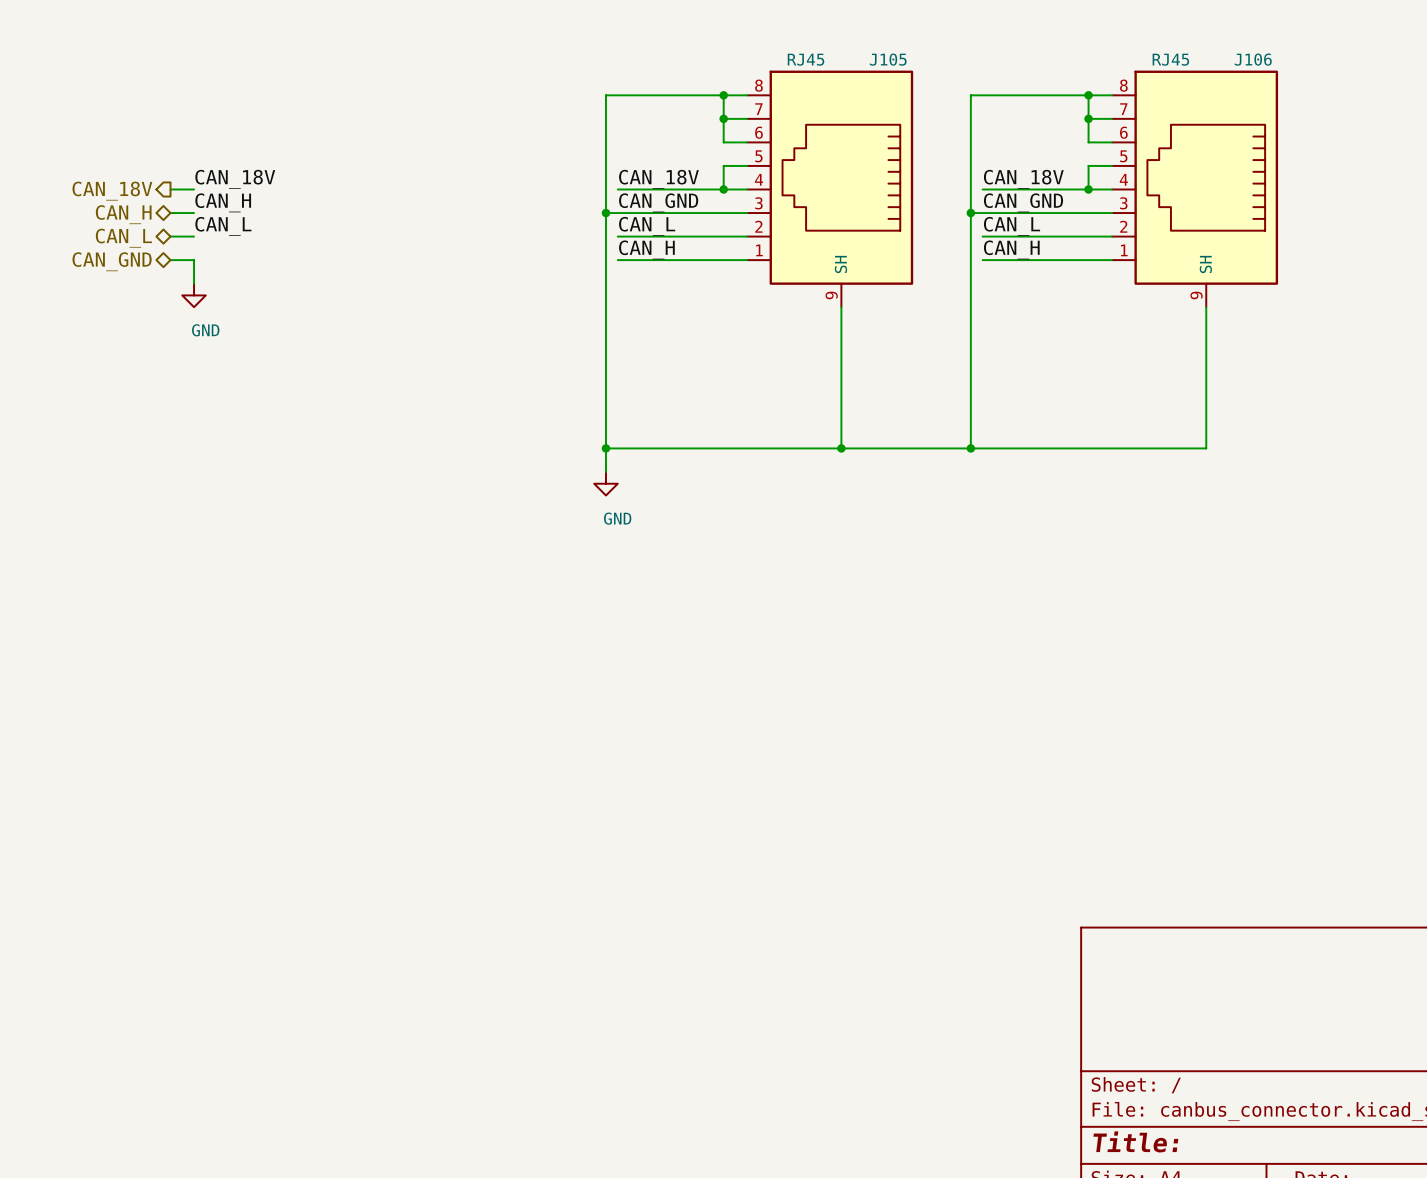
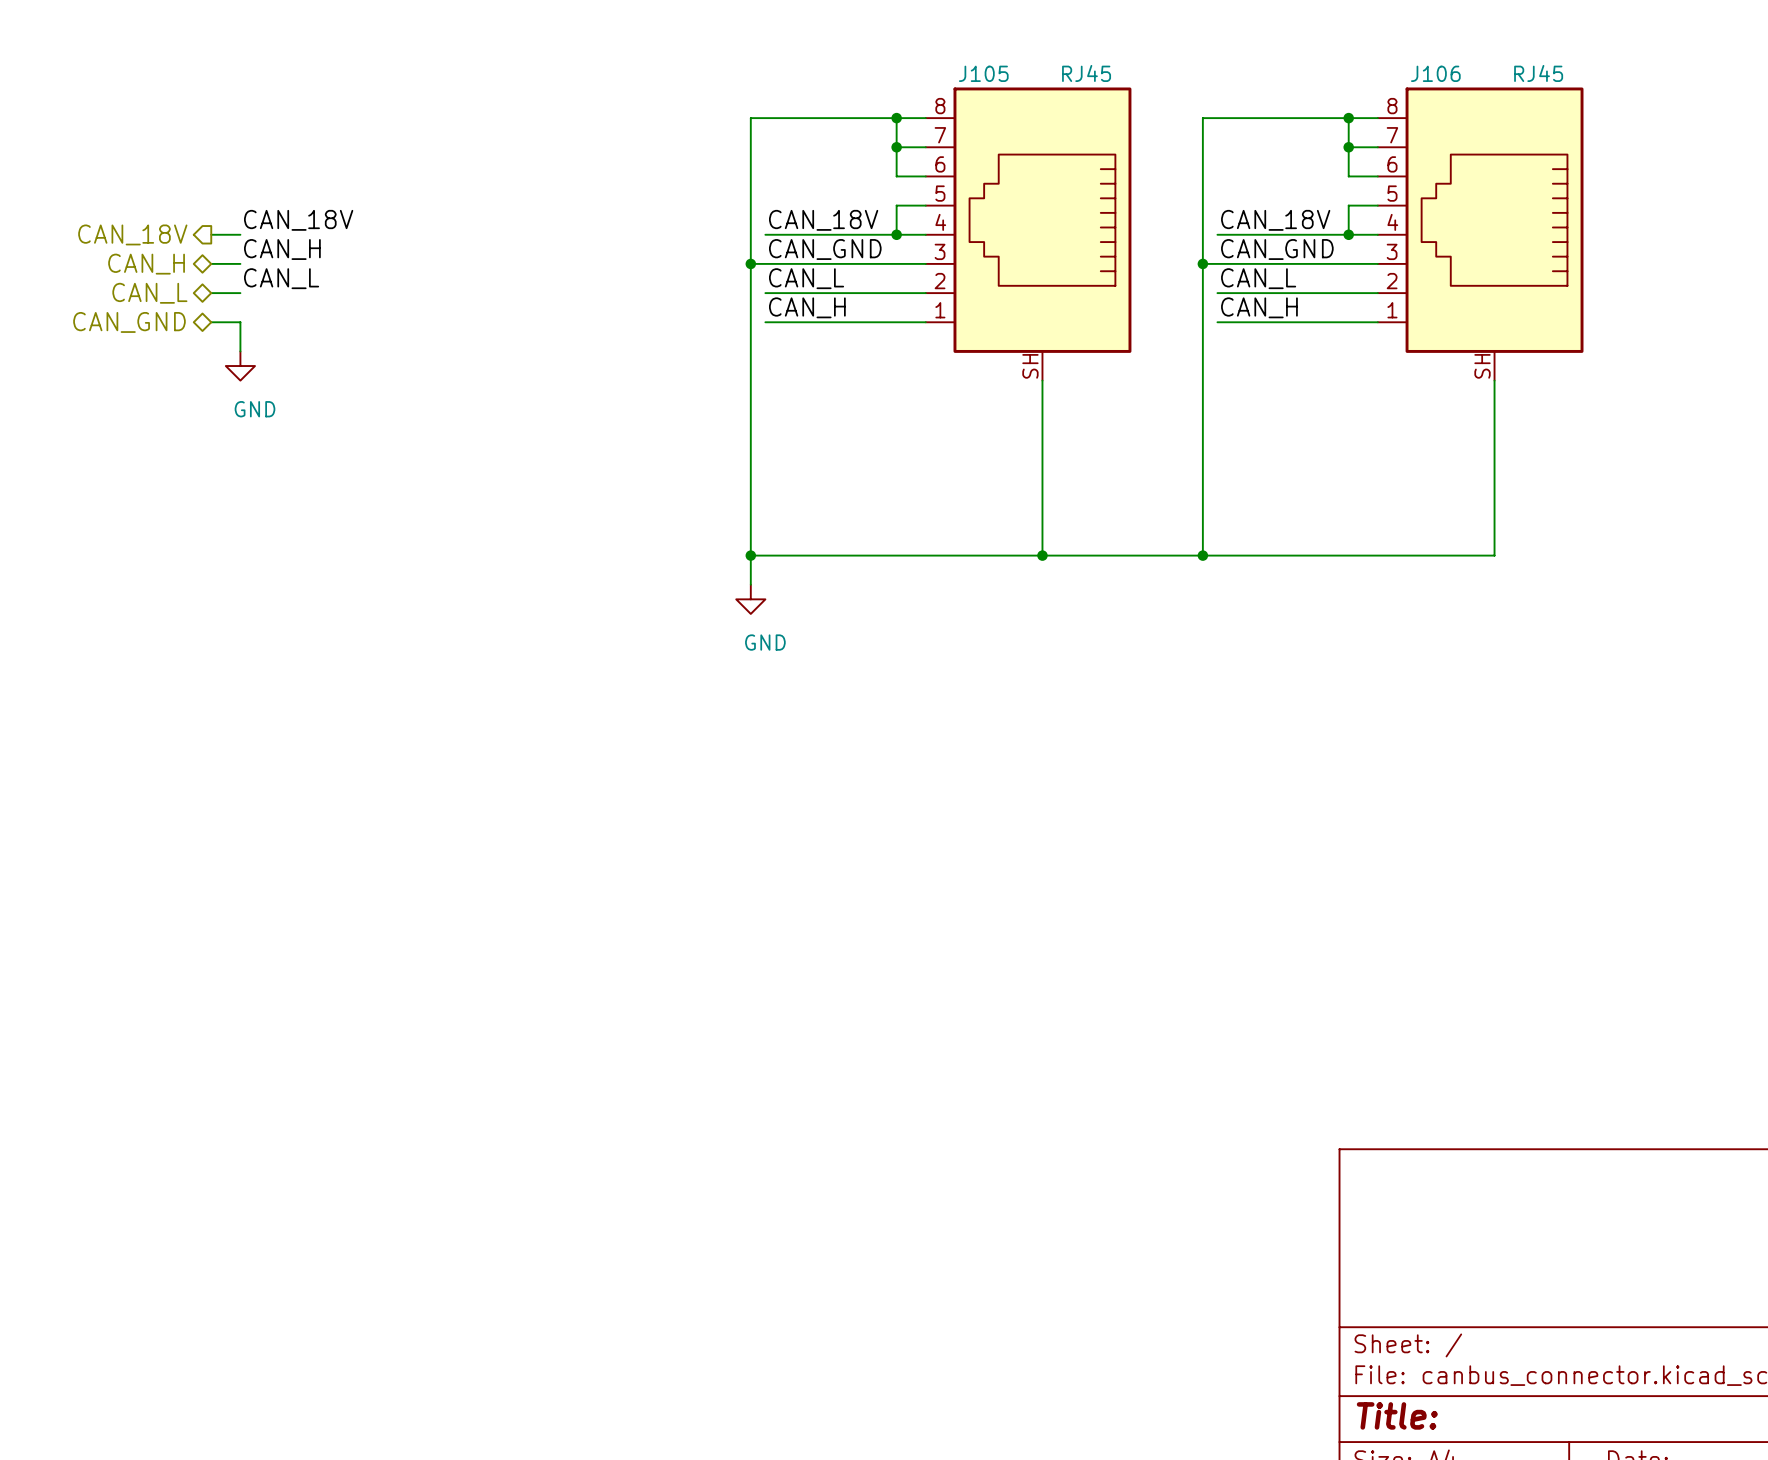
J105 value position: RJ45 (806, 59) -> RJ45 (1086, 73)
J105 name position: J105 (888, 59) -> J105 (983, 73)
J106 value position: RJ45 (1170, 59) -> RJ45 (1538, 73)
J106 name position: J106 (1253, 59) -> J106 (1435, 73)
J105 pin name: SH (840, 264) -> none
J106 pin name: SH (1205, 264) -> none
J105 pin number: 9 (831, 295) -> SH (1030, 366)
J106 pin number: 9 (1196, 295) -> SH (1482, 366)

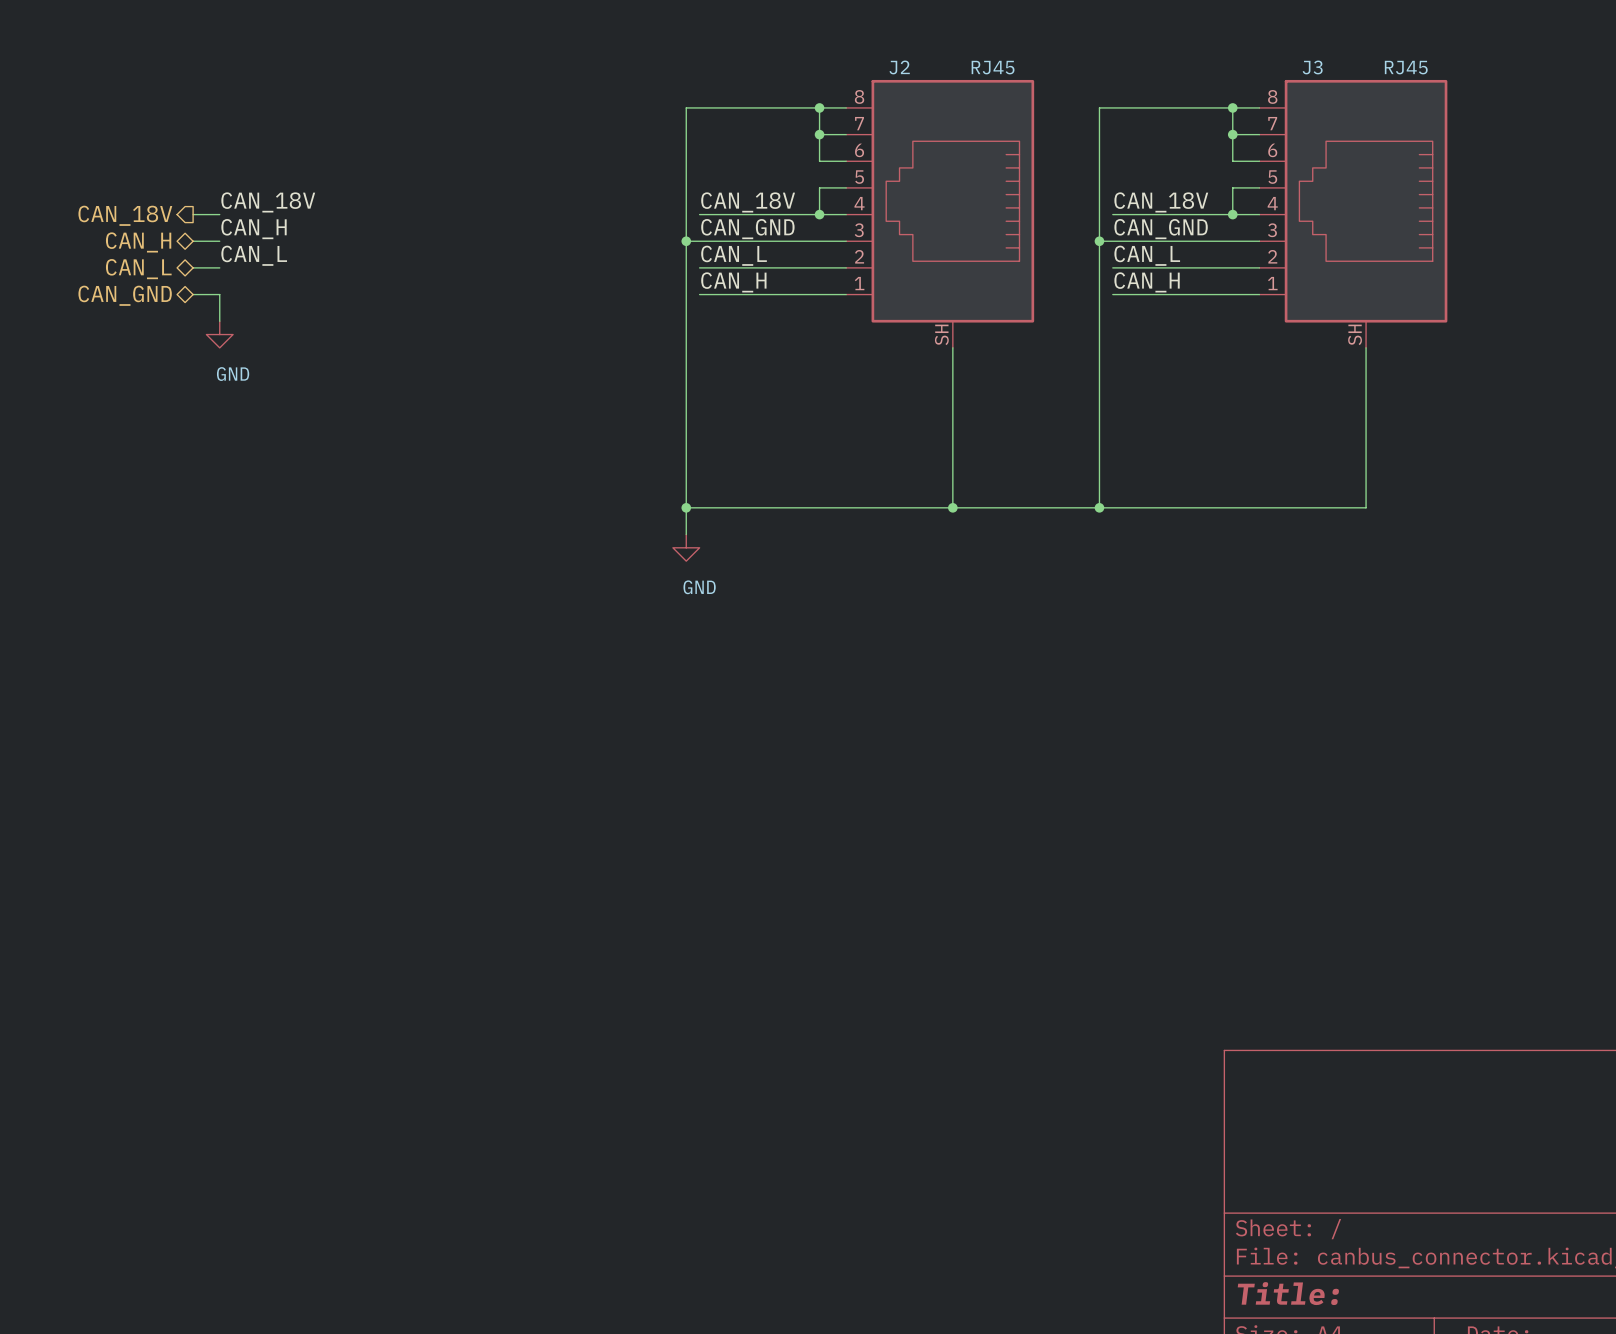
J105 name: J105 (983, 73) -> J2 (899, 67)
J106 name: J106 (1435, 73) -> J3 (1312, 67)

